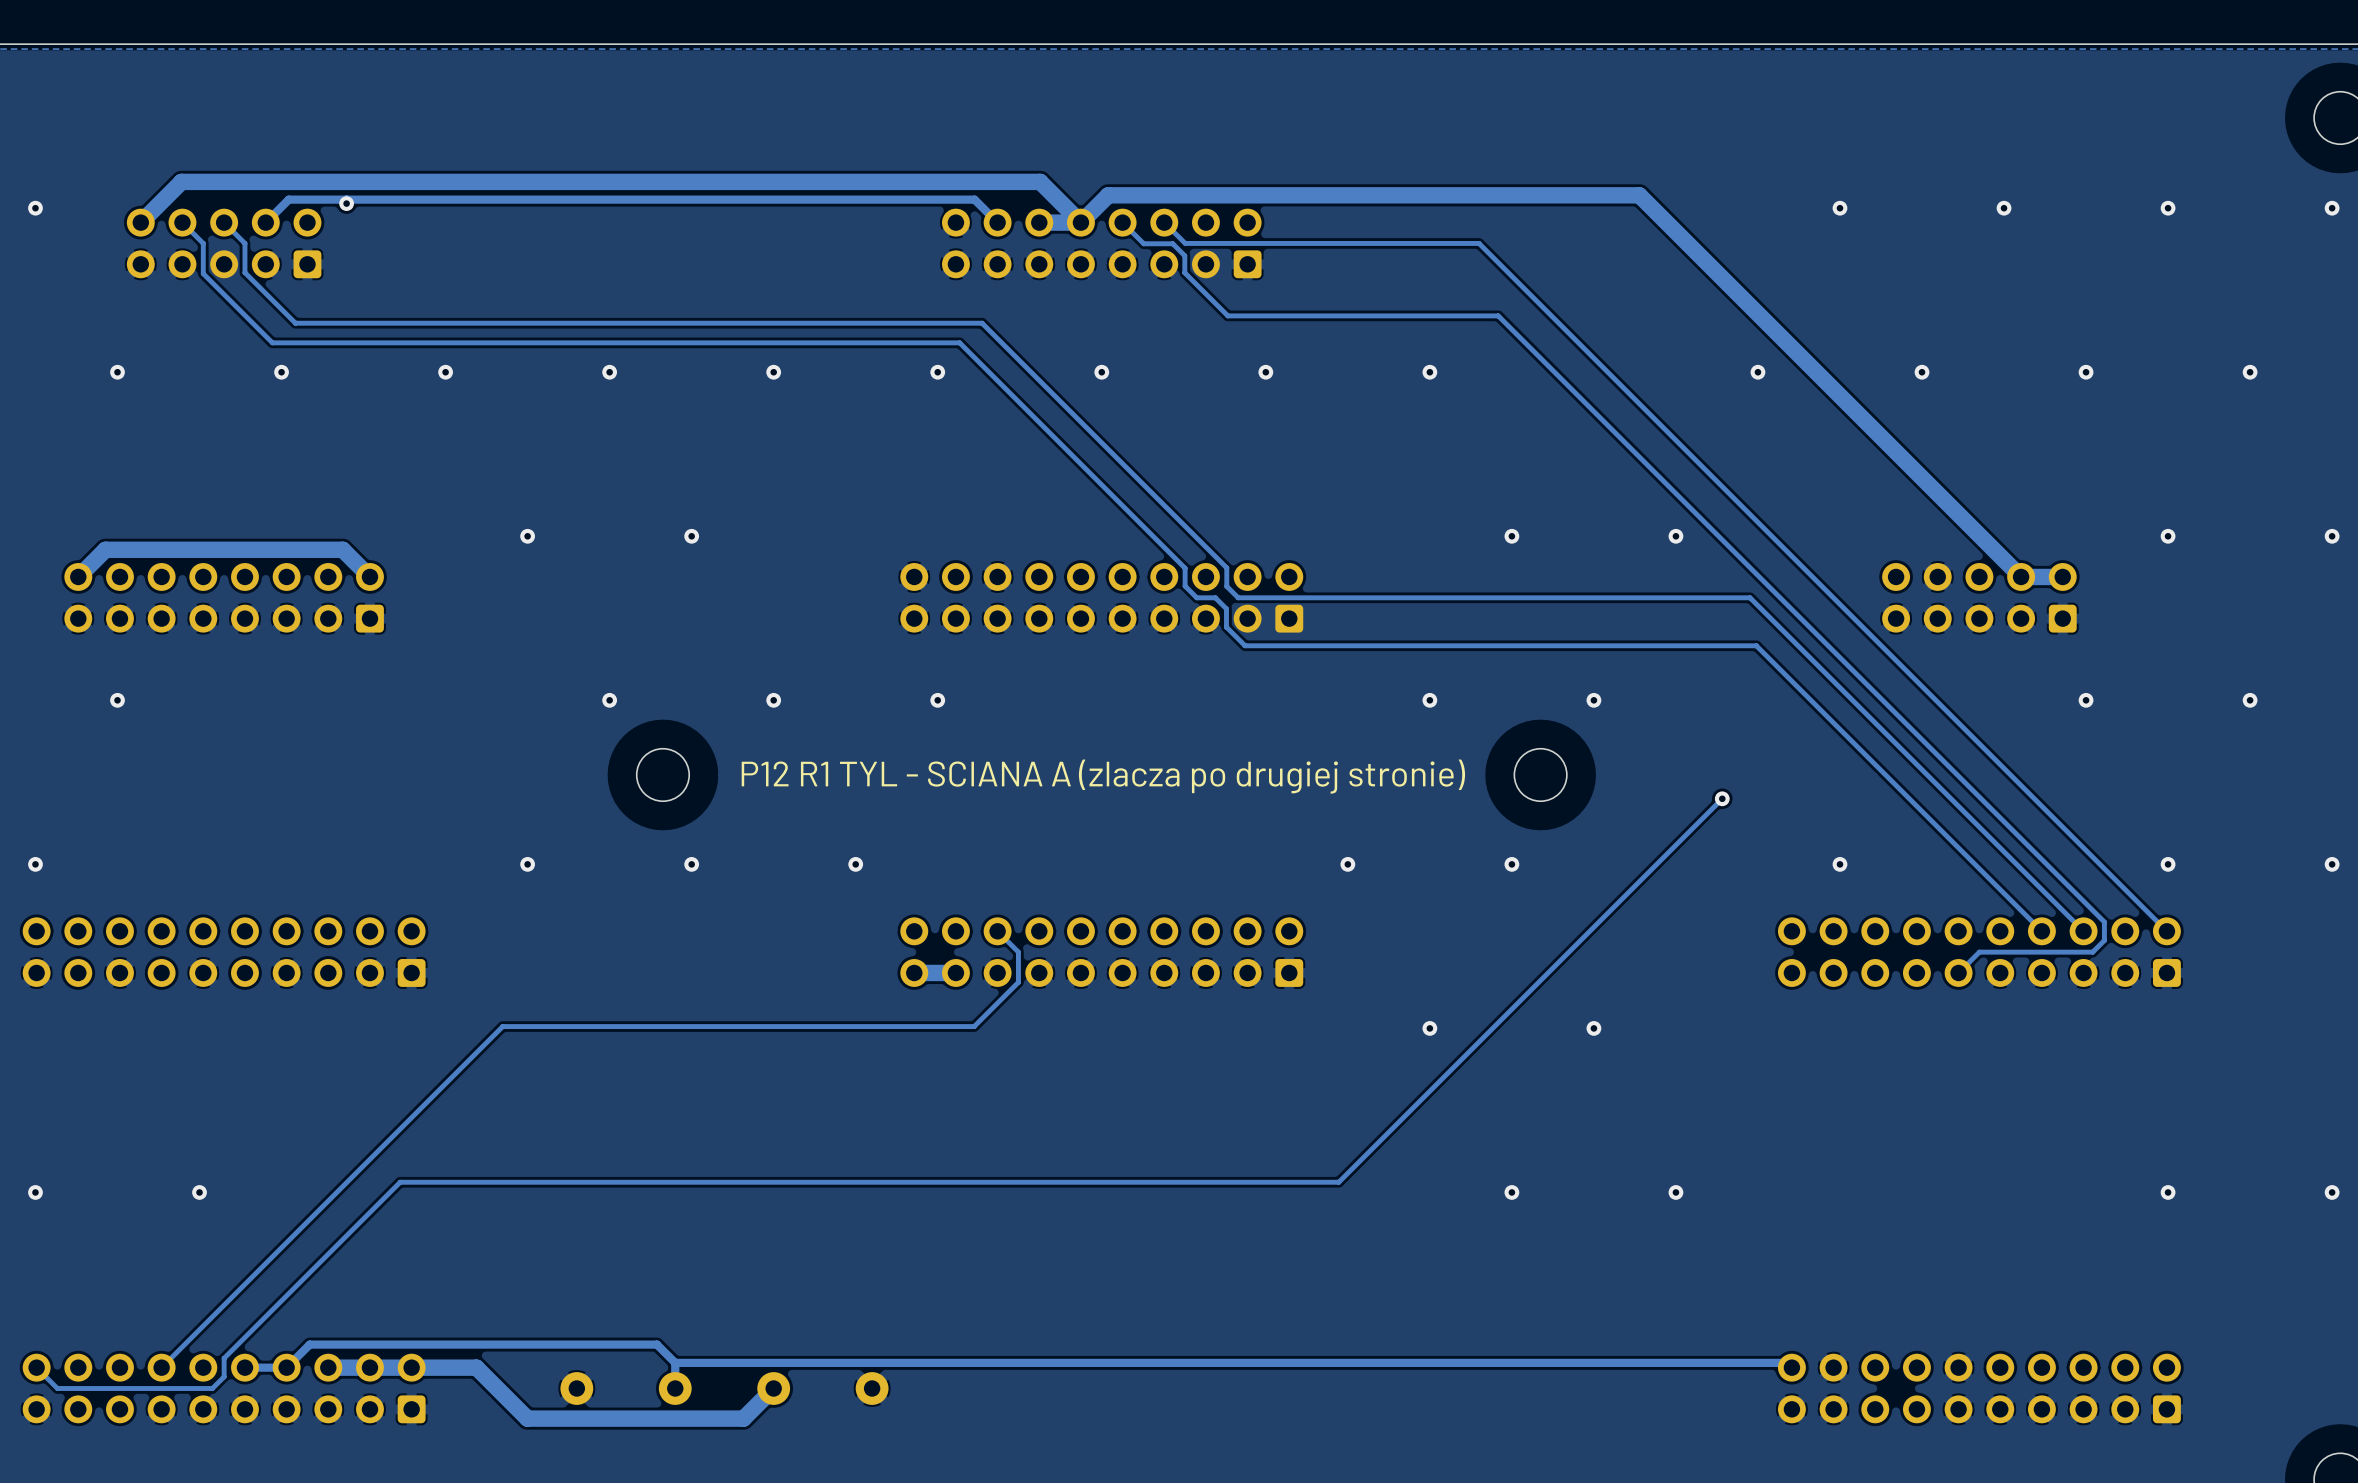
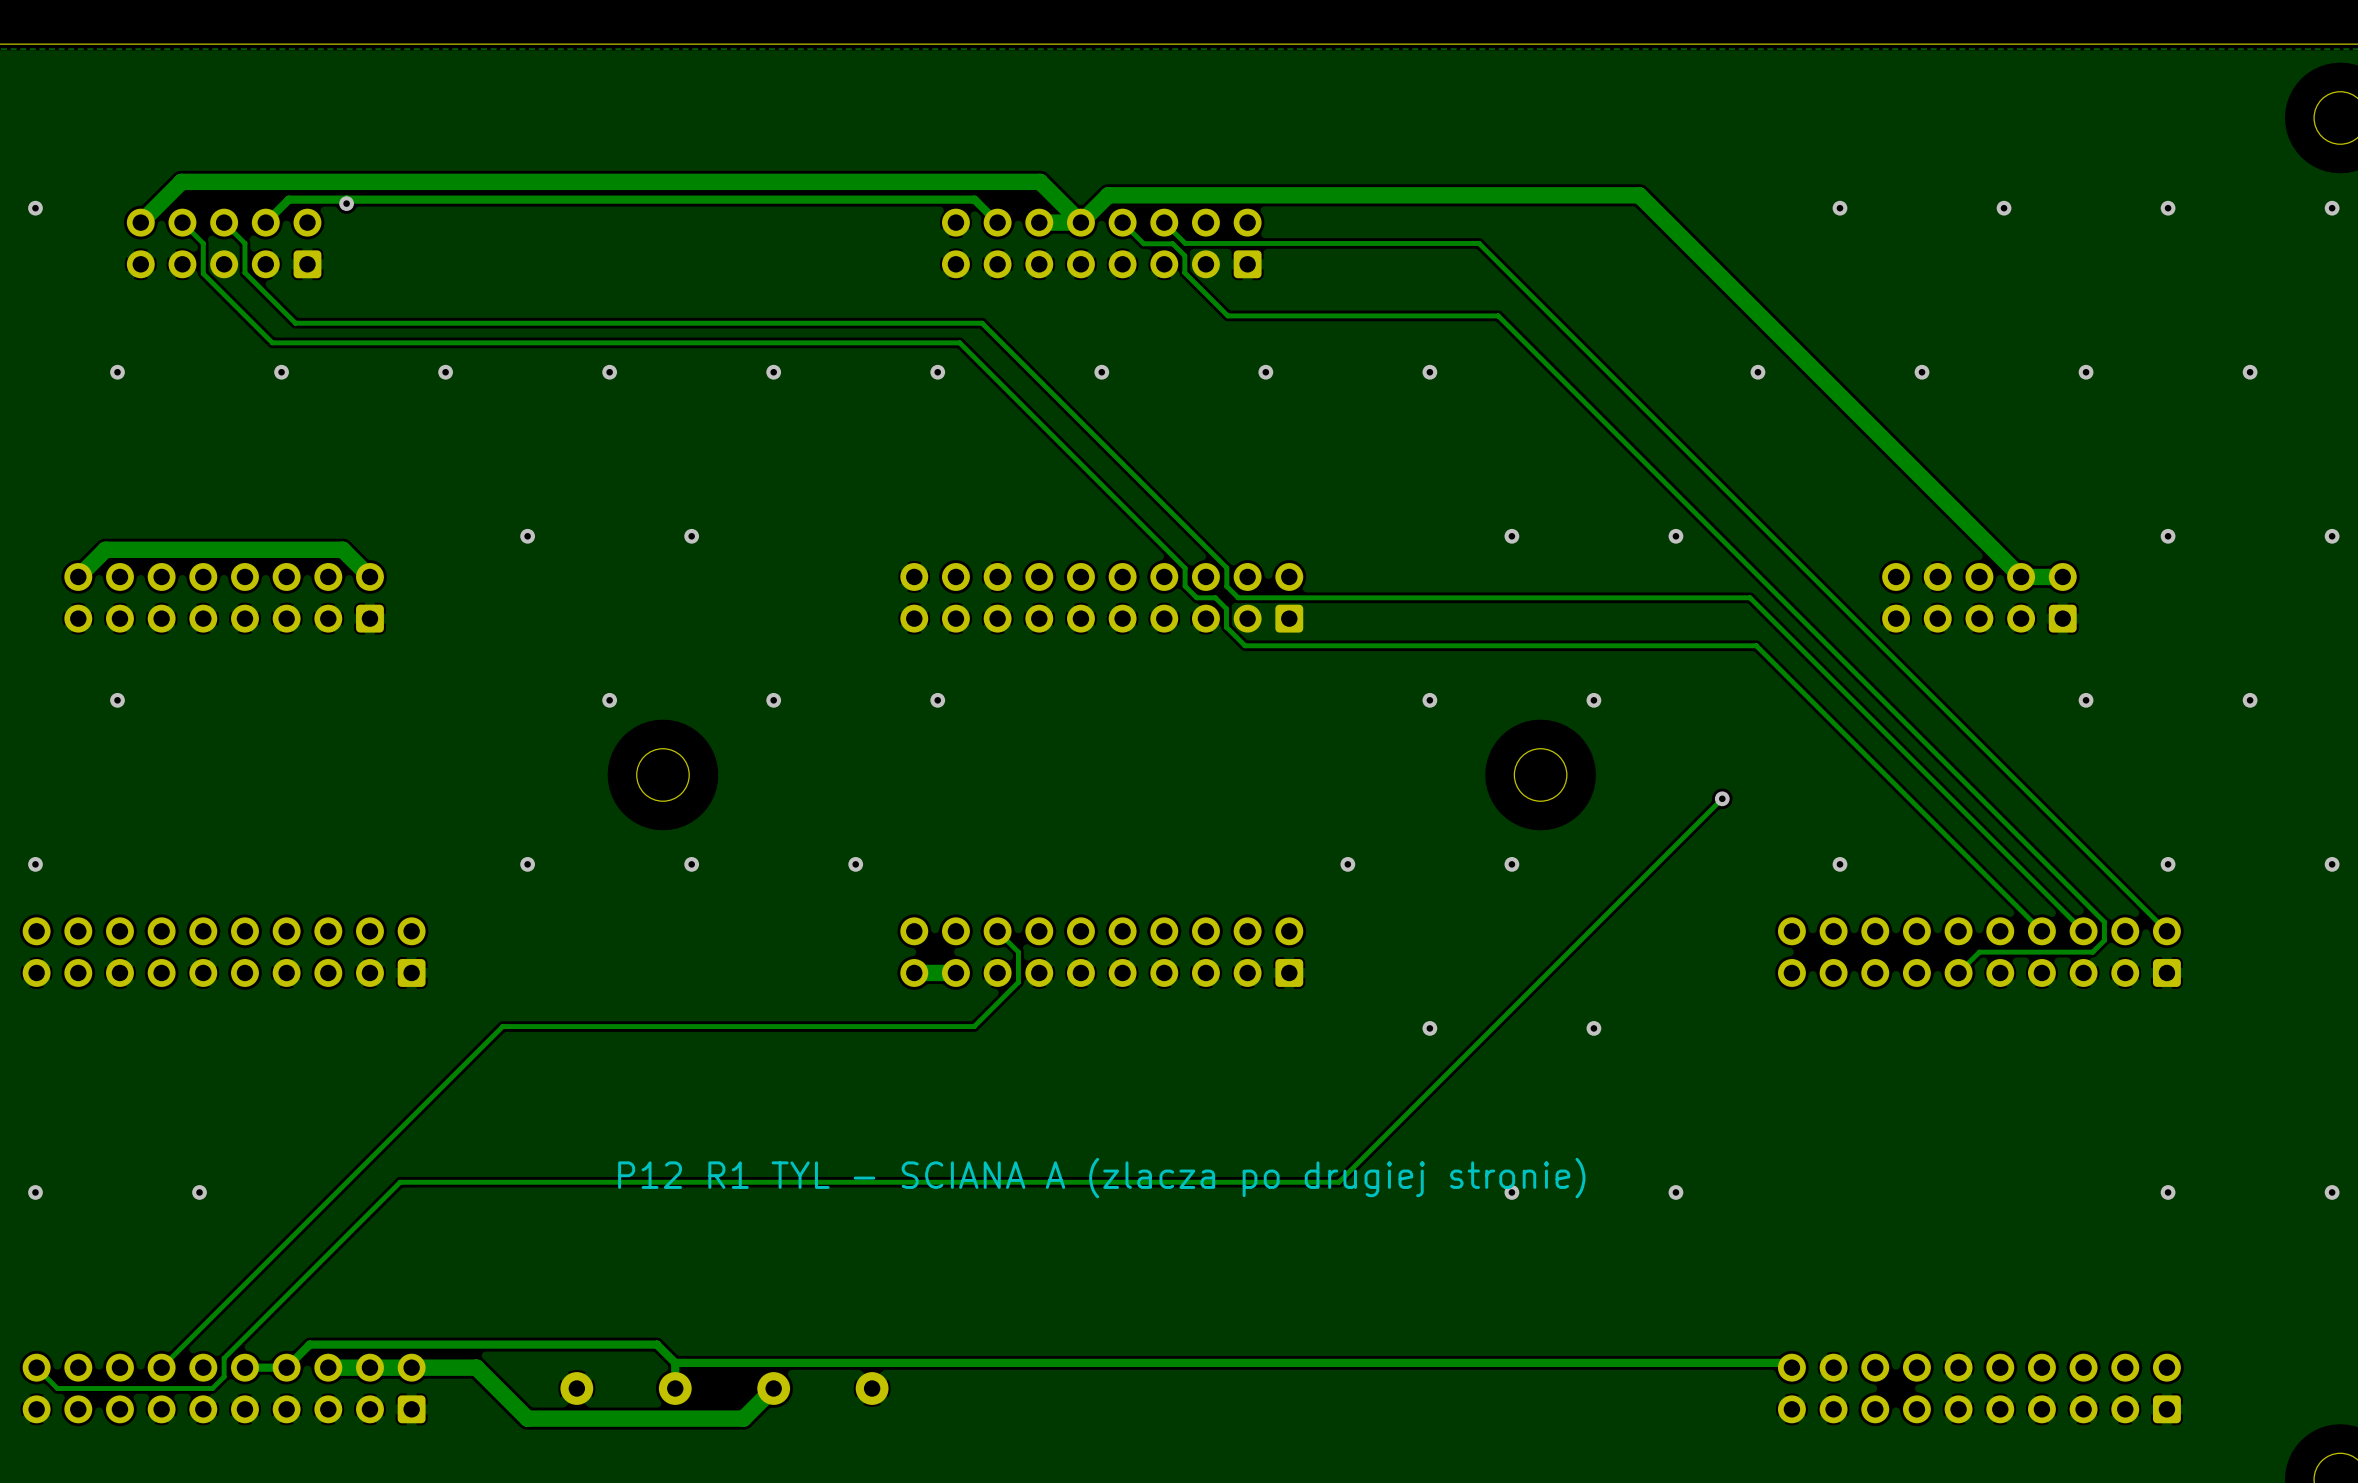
text position: P12 R1 TYL - SCIANA A (zlacza po drugiej stronie) (1103, 776) -> P12 R1 TYL - SCIANA A (zlacza po drugiej stronie) (1101, 1178)

